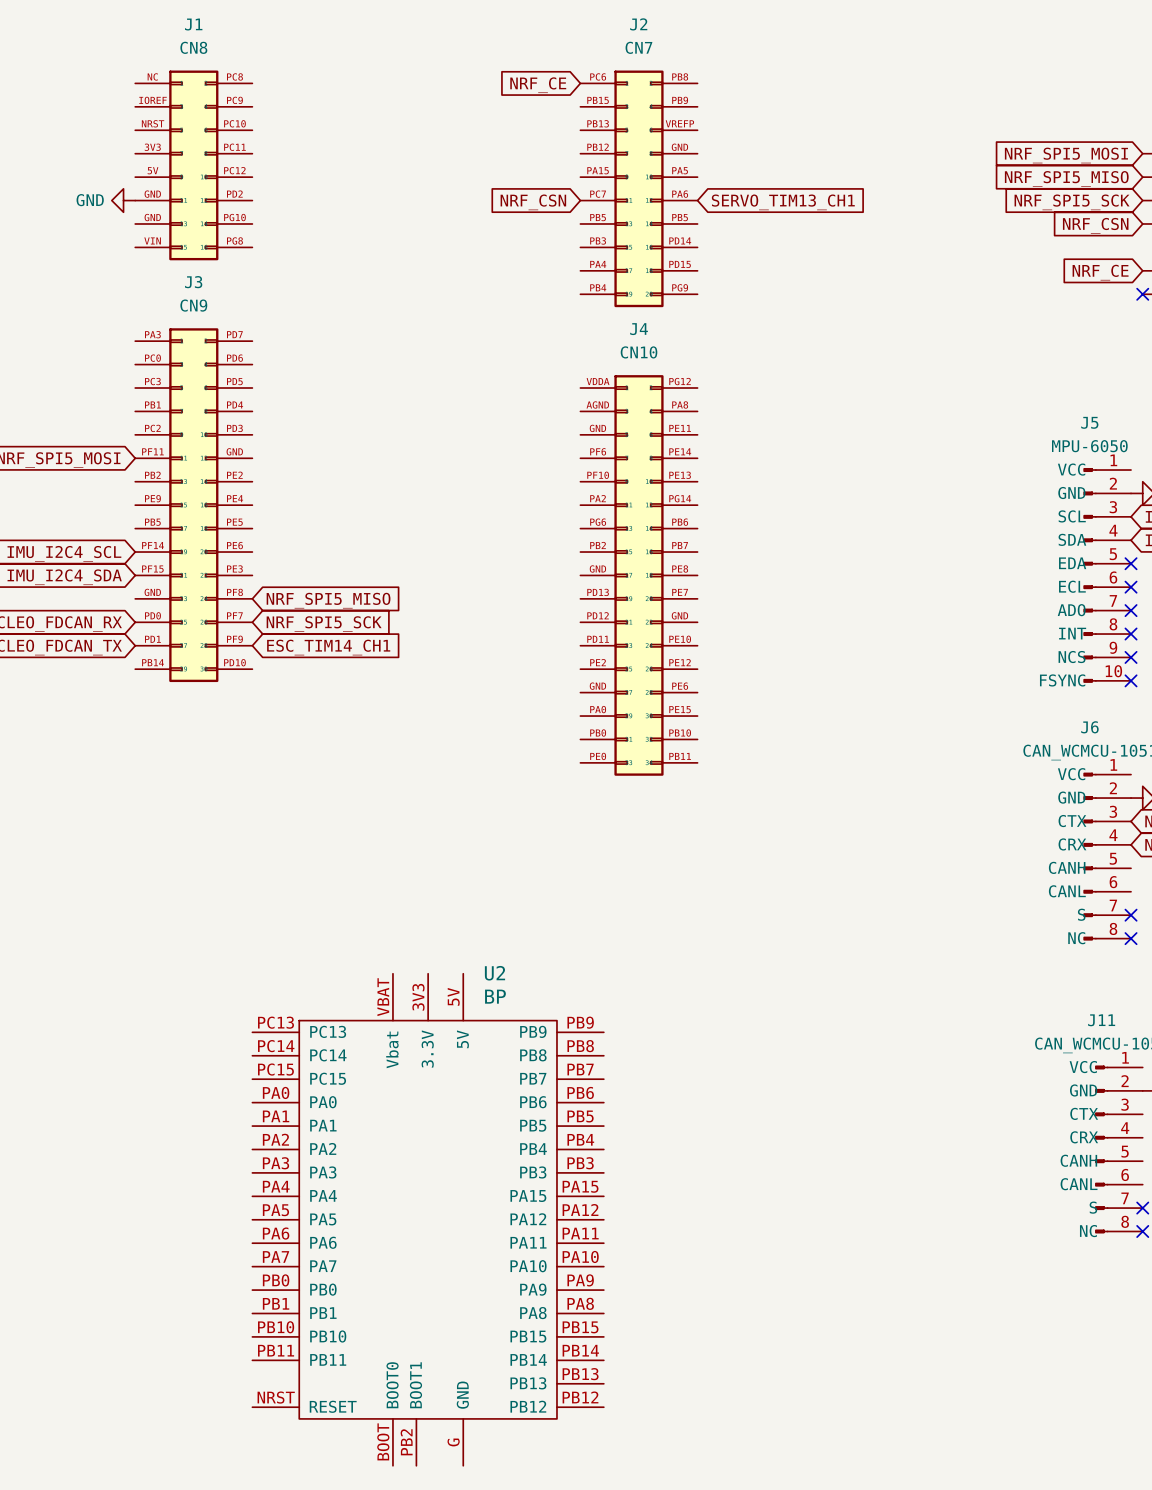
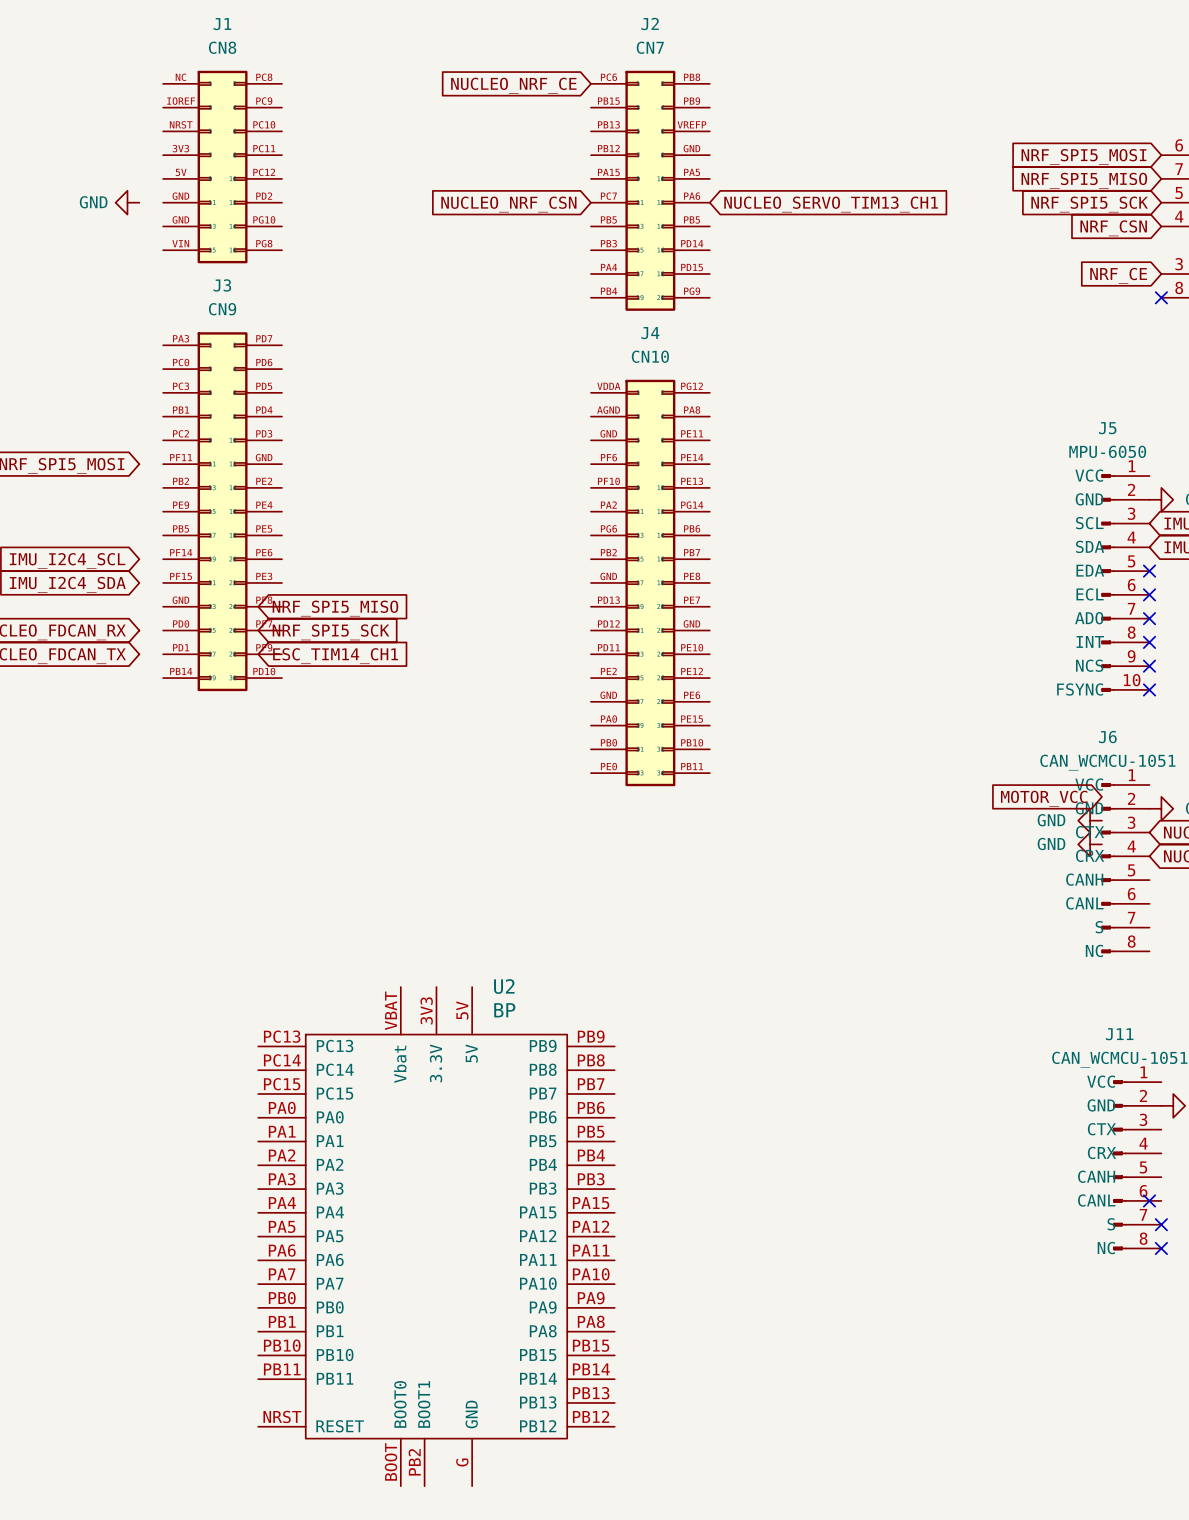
global label: NRF_CE (538, 85) -> NUCLEO_NRF_CE (513, 85)
J1 position: (193, 165) -> (222, 167)
global label: NRF_CSN (533, 202) -> NUCLEO_NRF_CSN (508, 204)
global label: SERVO_TIM13_CH1 (783, 202) -> NUCLEO_SERVO_TIM13_CH1 (831, 204)
J3 position: (193, 505) -> (222, 511)
global label: none -> MOTOR_VCC (1044, 798)
power symbol: none -> GND (1090, 820)
power symbol: none -> GND (1090, 844)
no-connect mark: (1131, 915) -> none
no-connect mark: (1131, 938) -> none
no-connect mark: none -> (1149, 1200)

